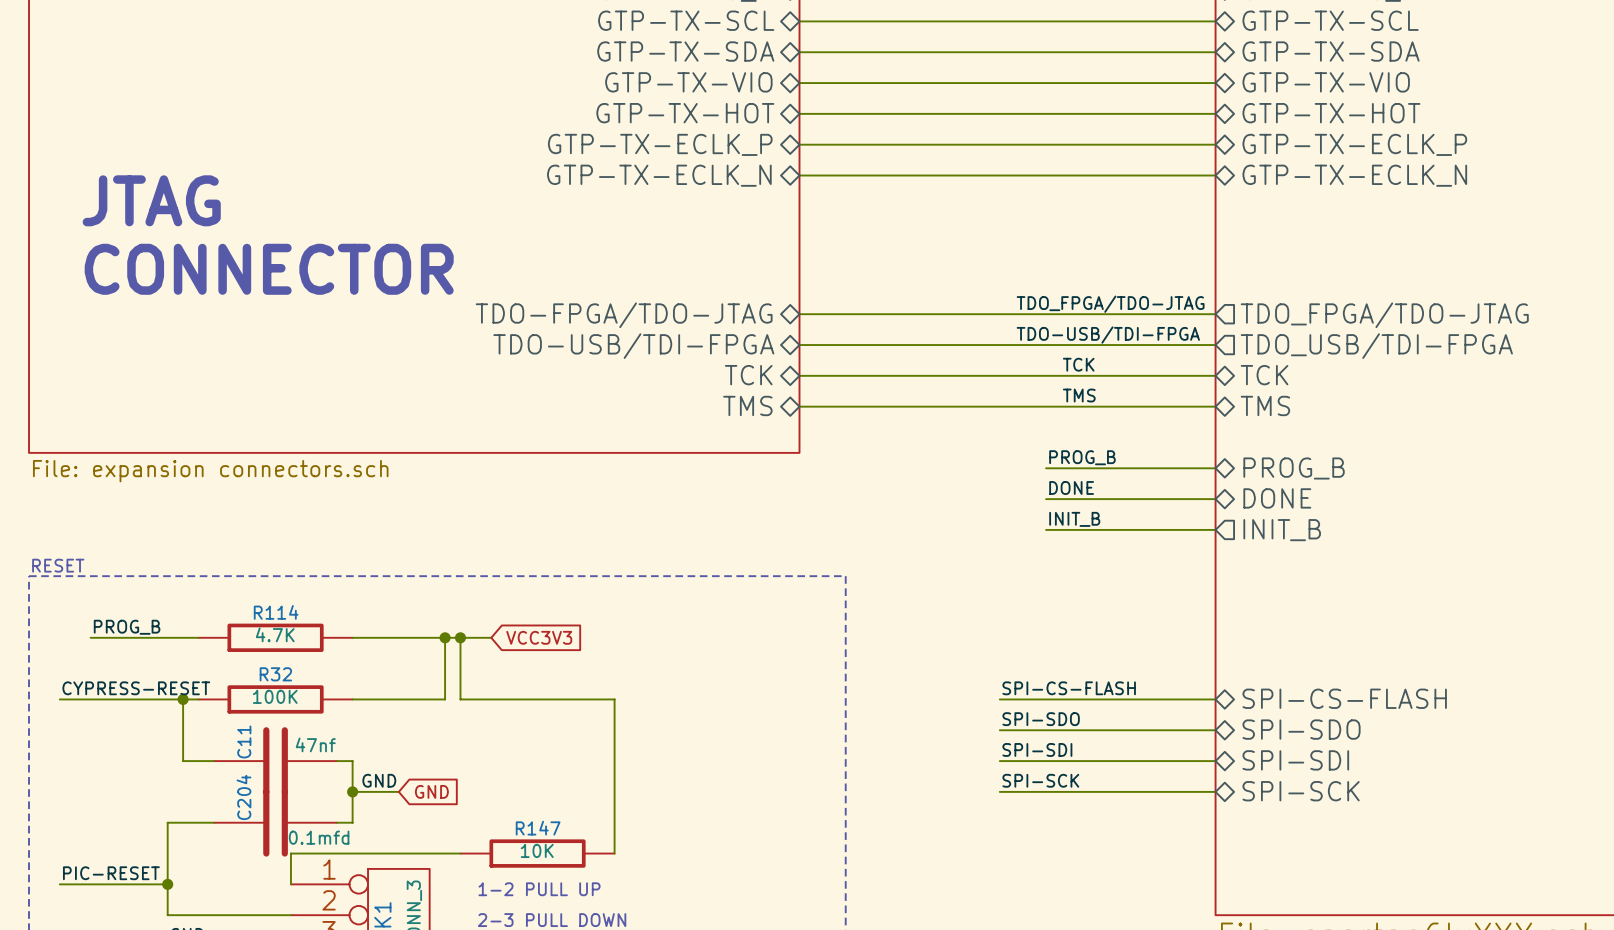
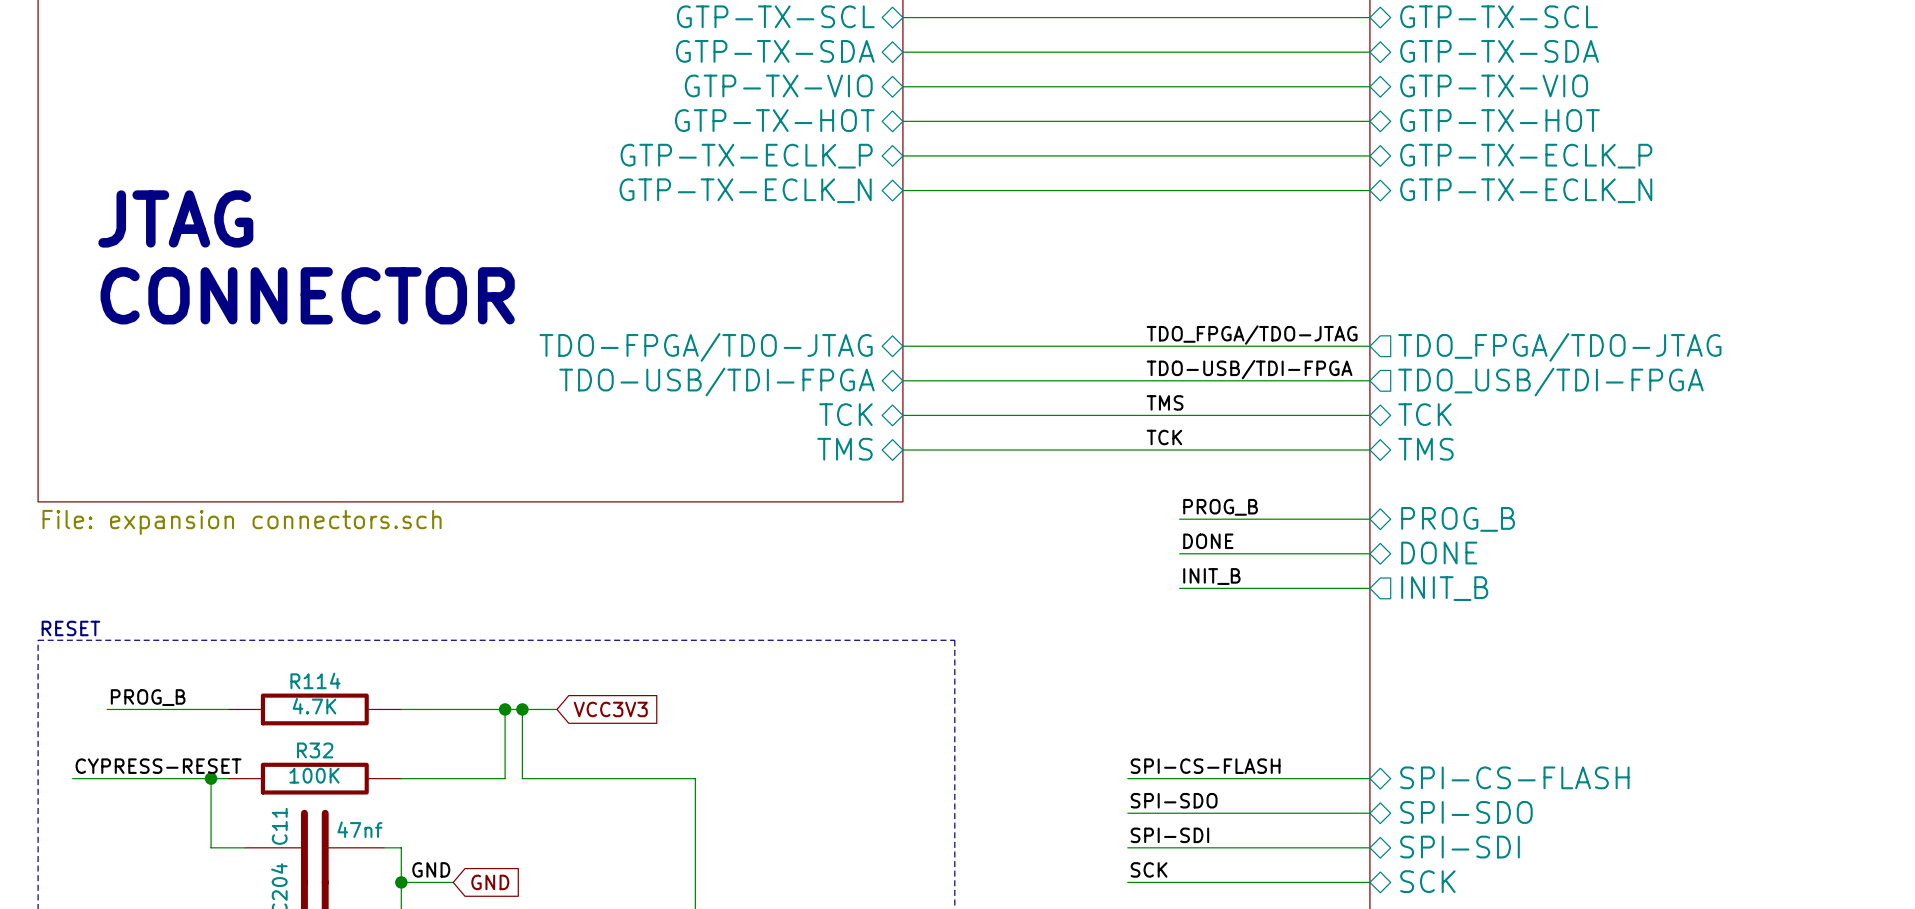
label position: TCK (1078, 364) -> TCK (1164, 437)
label position: TMS (1079, 395) -> TMS (1165, 402)
label: SPI-SCK (1040, 780) -> SCK (1149, 869)
sheet pin: SPI-SCK (1301, 791) -> SCK (1427, 881)

